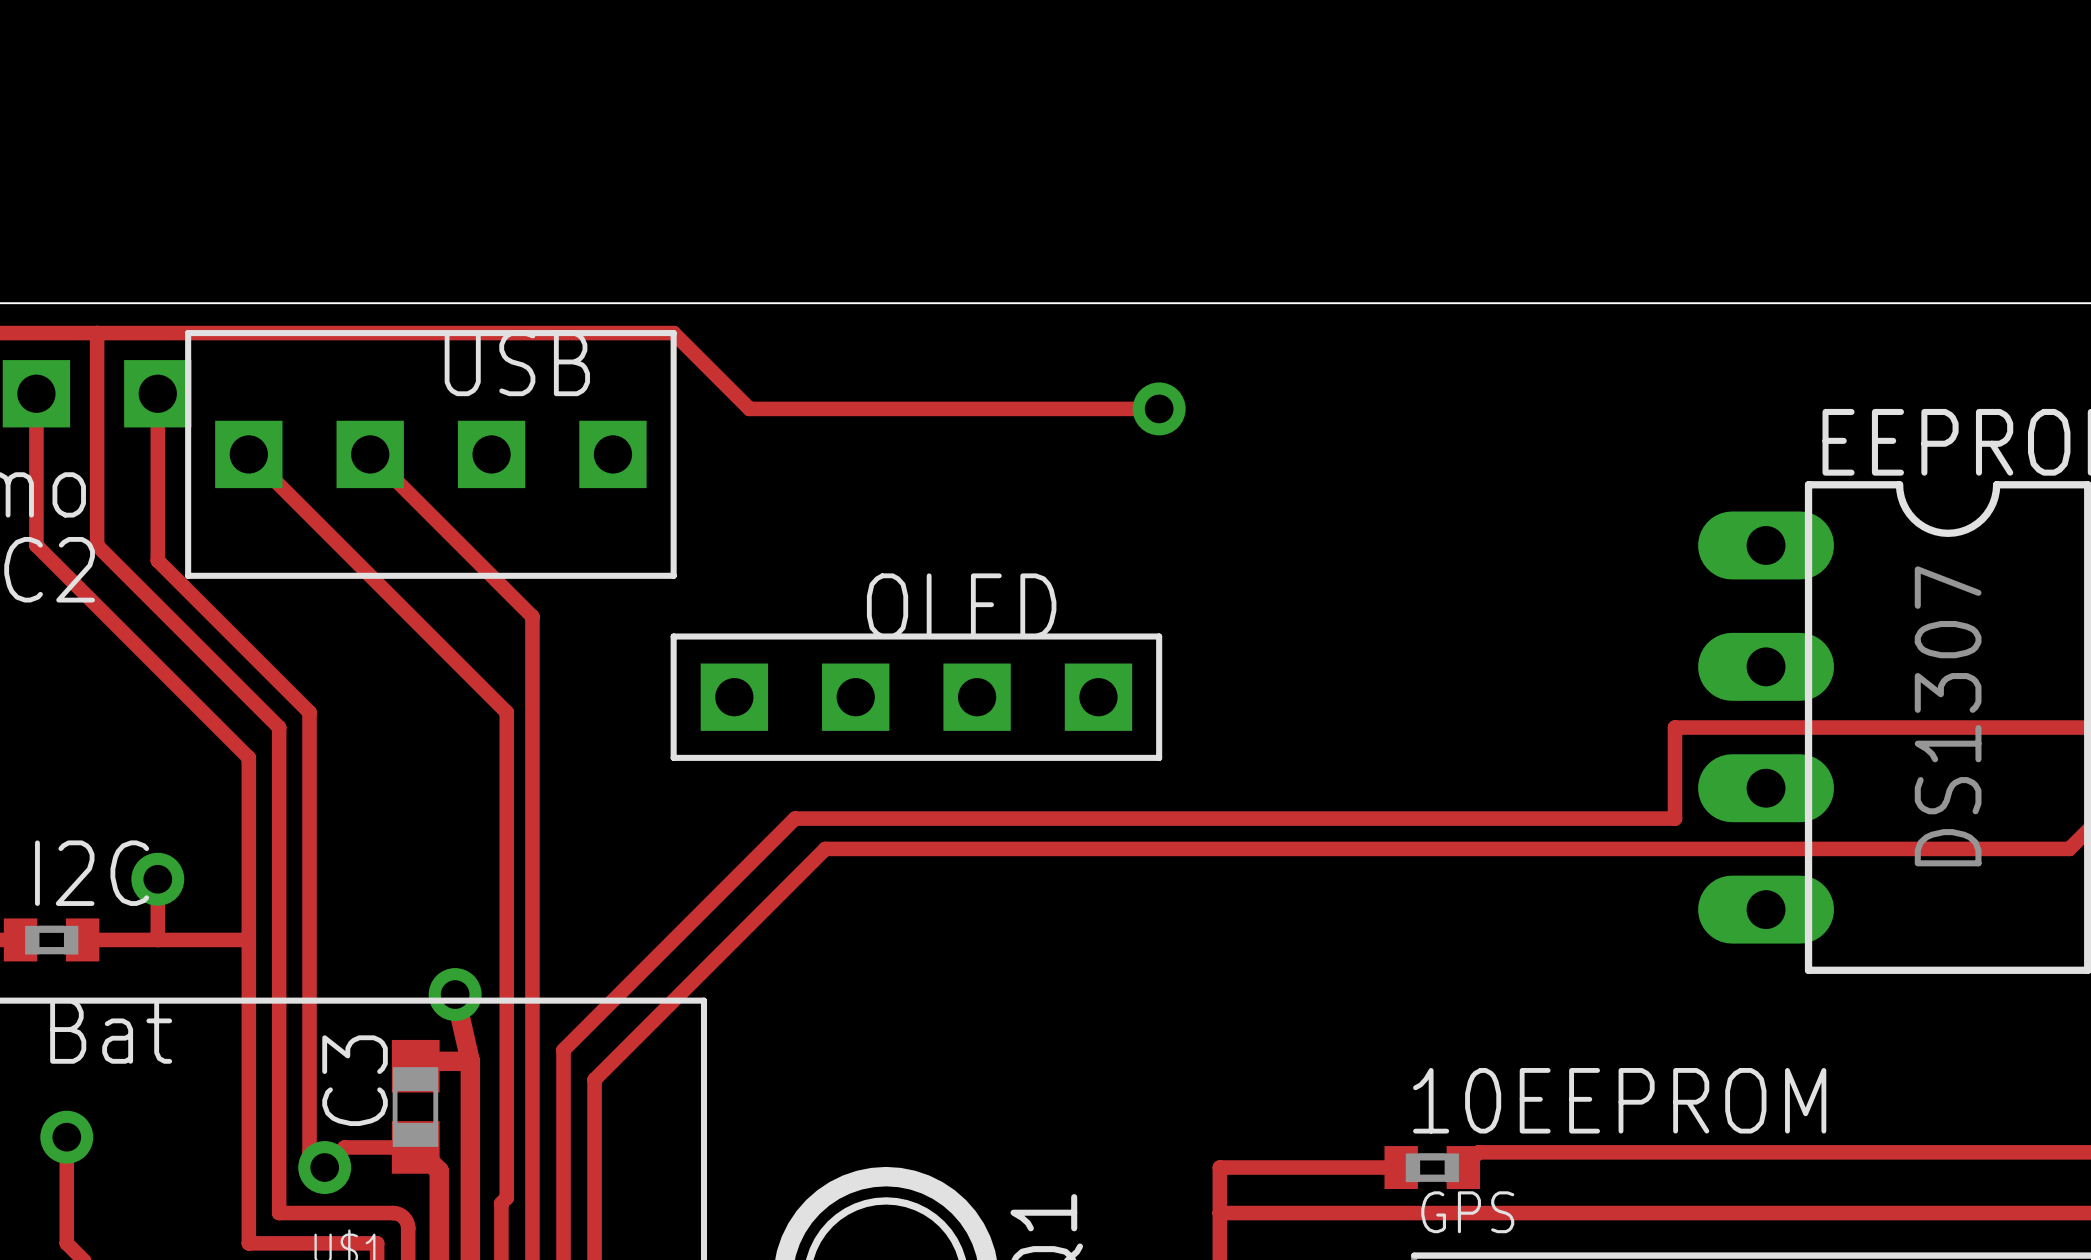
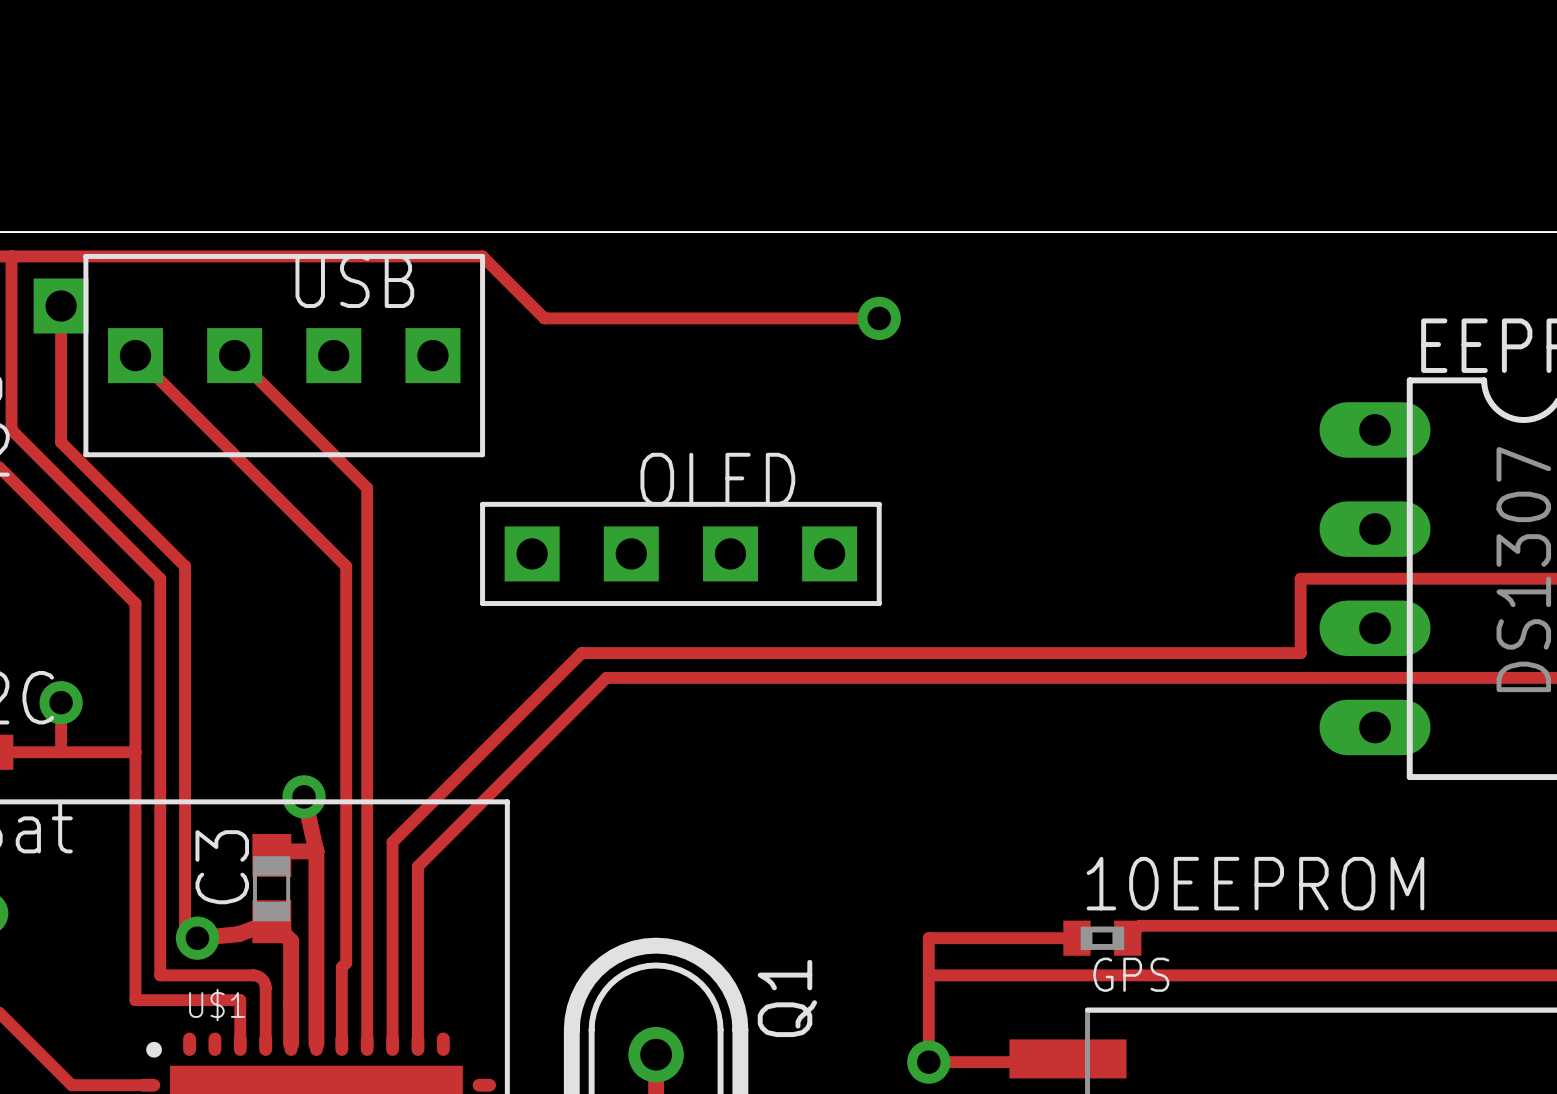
track: (415, 1147) (344, 1147) (324, 1167) -> (271, 921) (238, 934) (197, 938)

